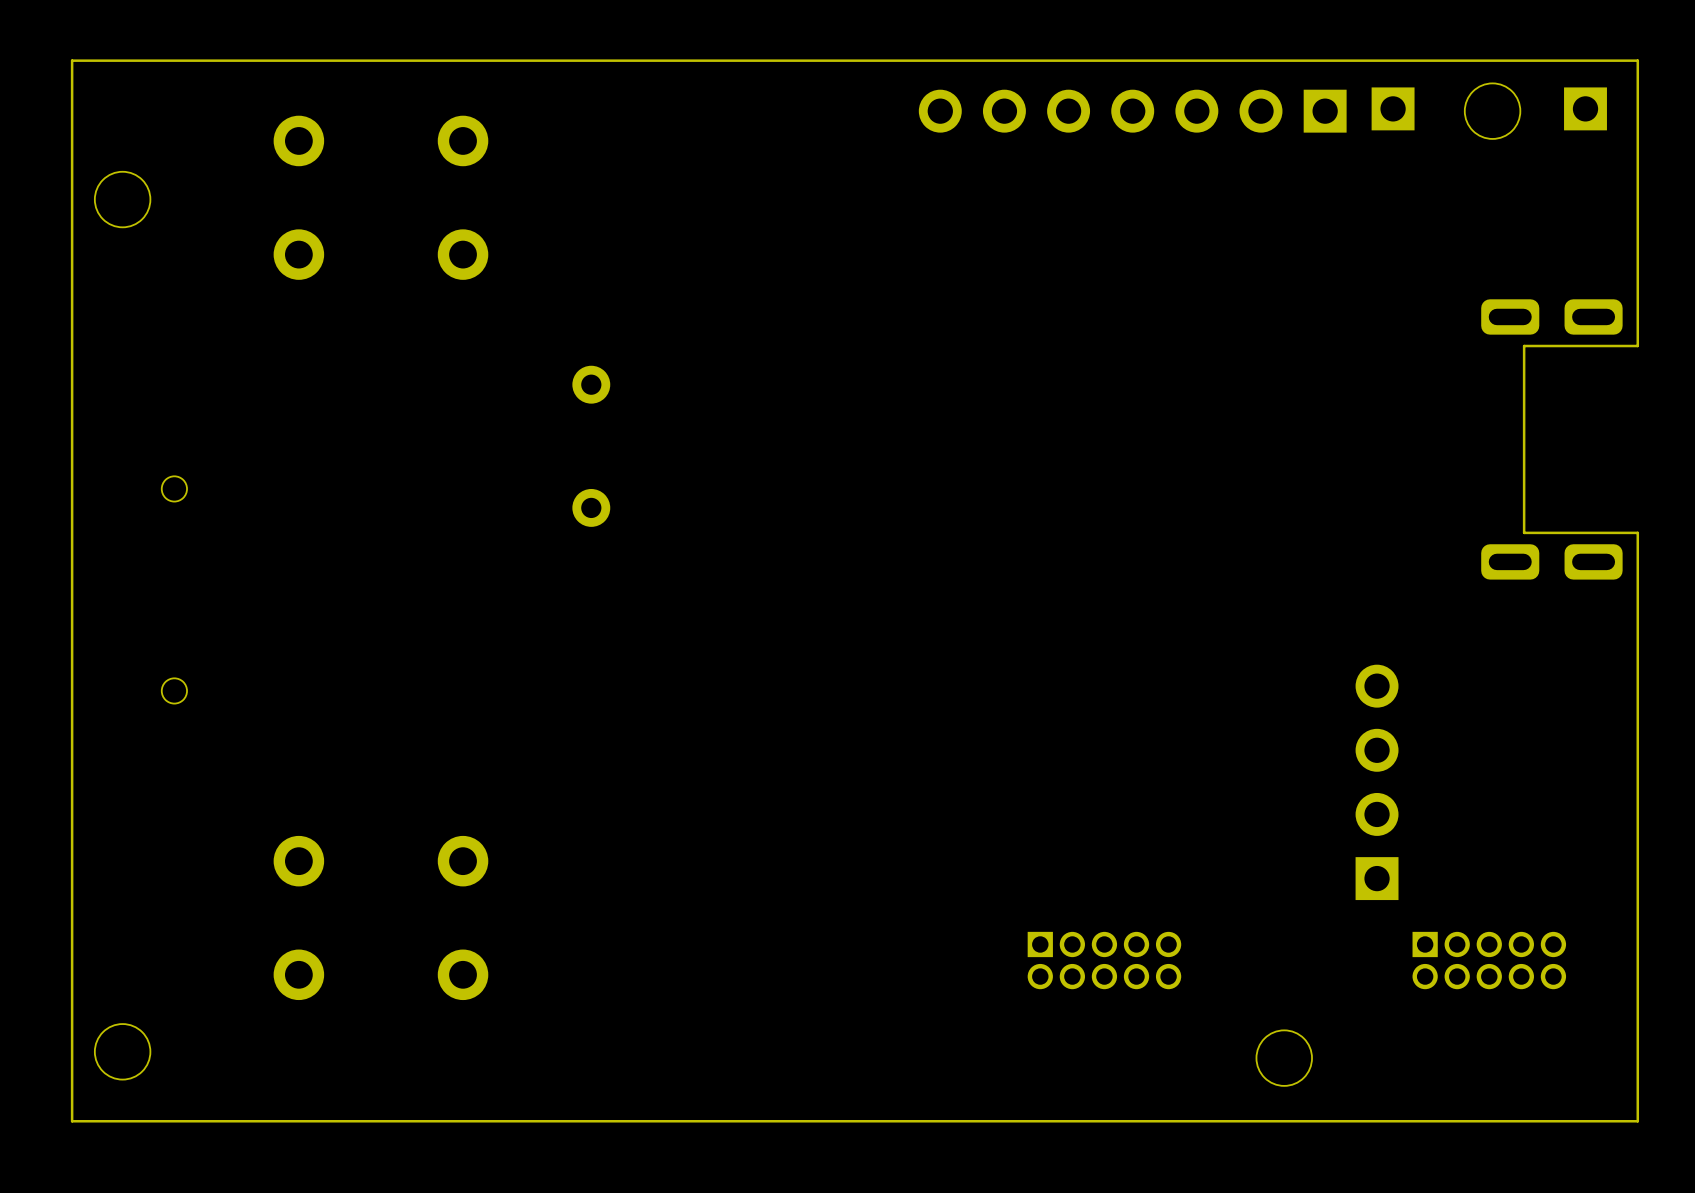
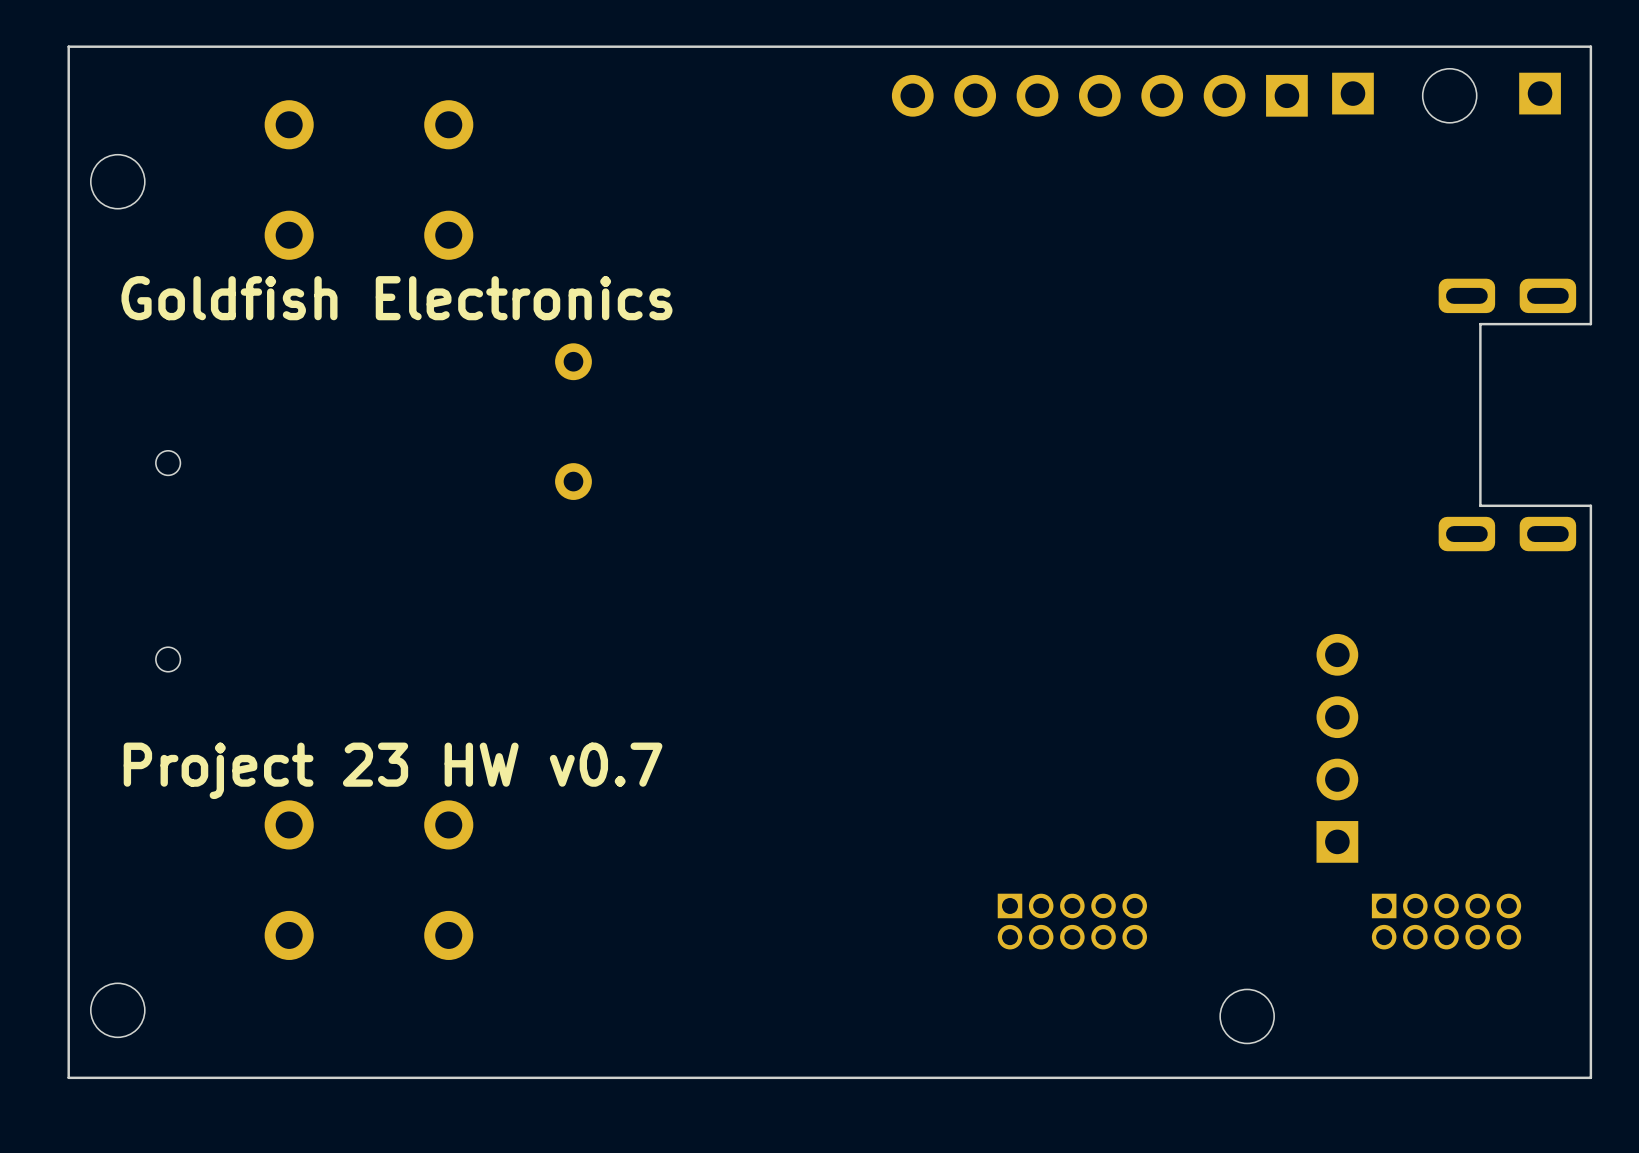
text: none -> Goldfish Electronics (396, 298)
text: none -> Project 23 HW v0.7 (393, 770)

